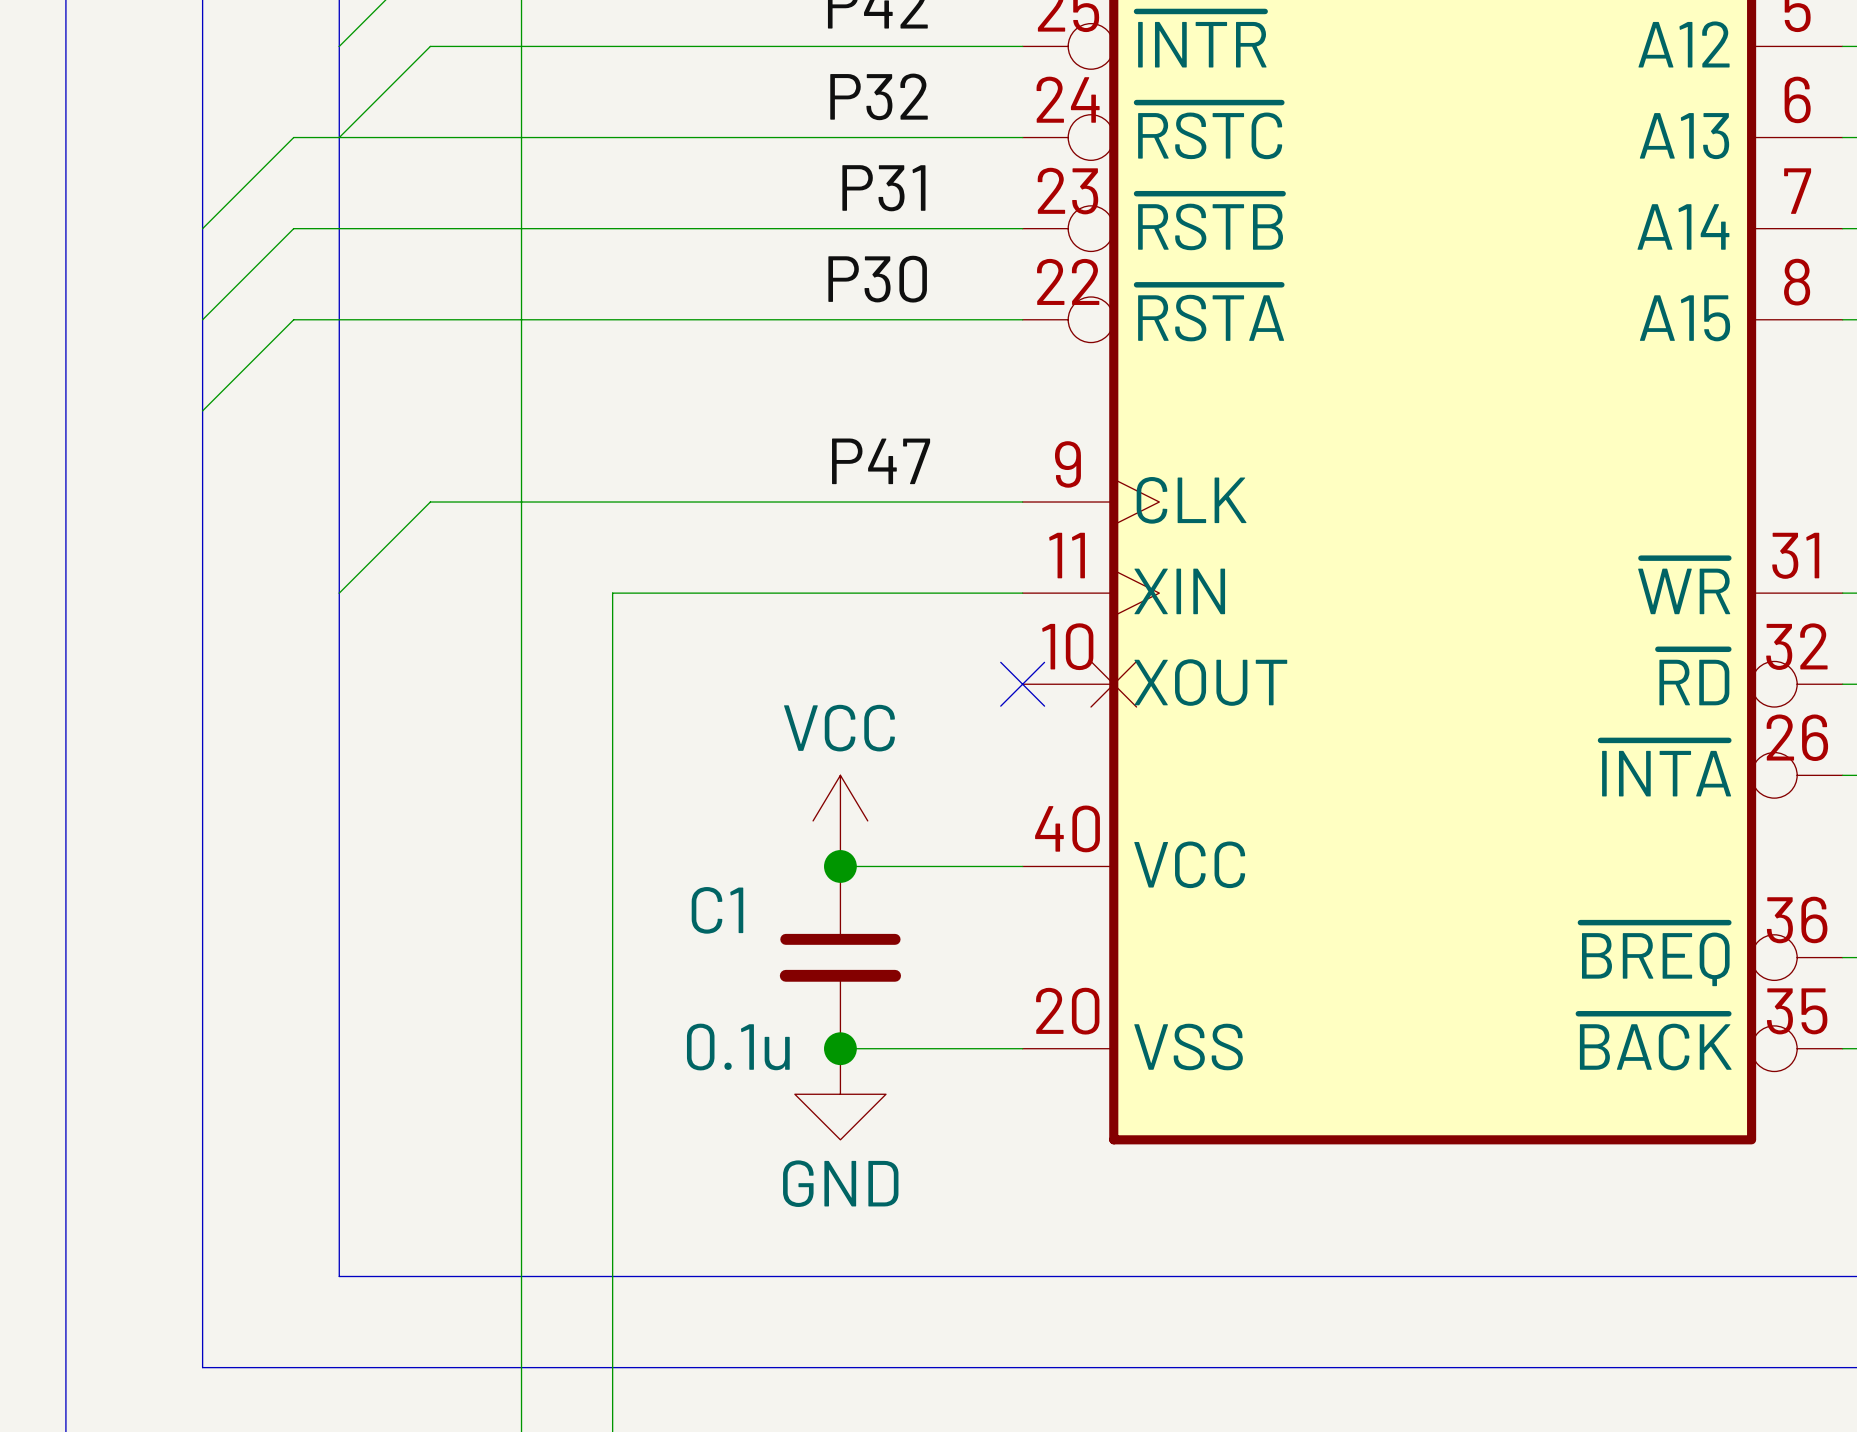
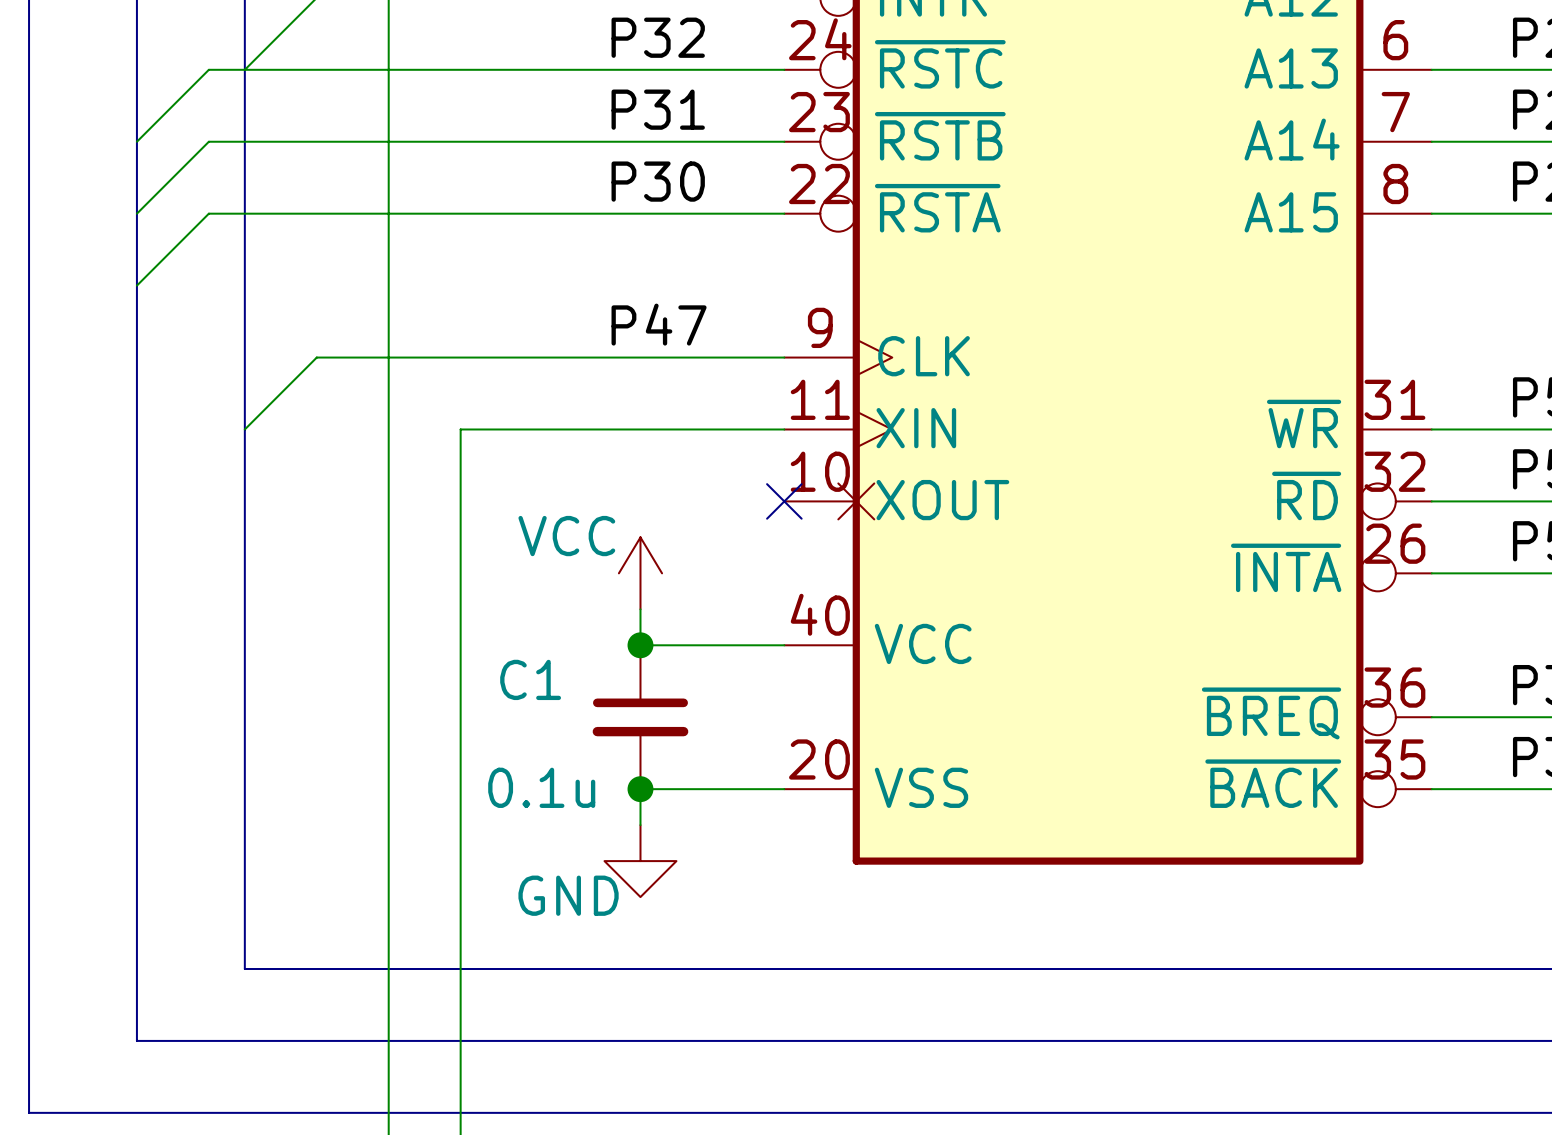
power symbol text position: VCC (839, 728) -> VCC (566, 536)
power symbol position: VCC (840, 820) -> VCC (640, 573)
power symbol position: GND (840, 1094) -> GND (640, 861)
power symbol text position: GND (840, 1183) -> GND (568, 895)

